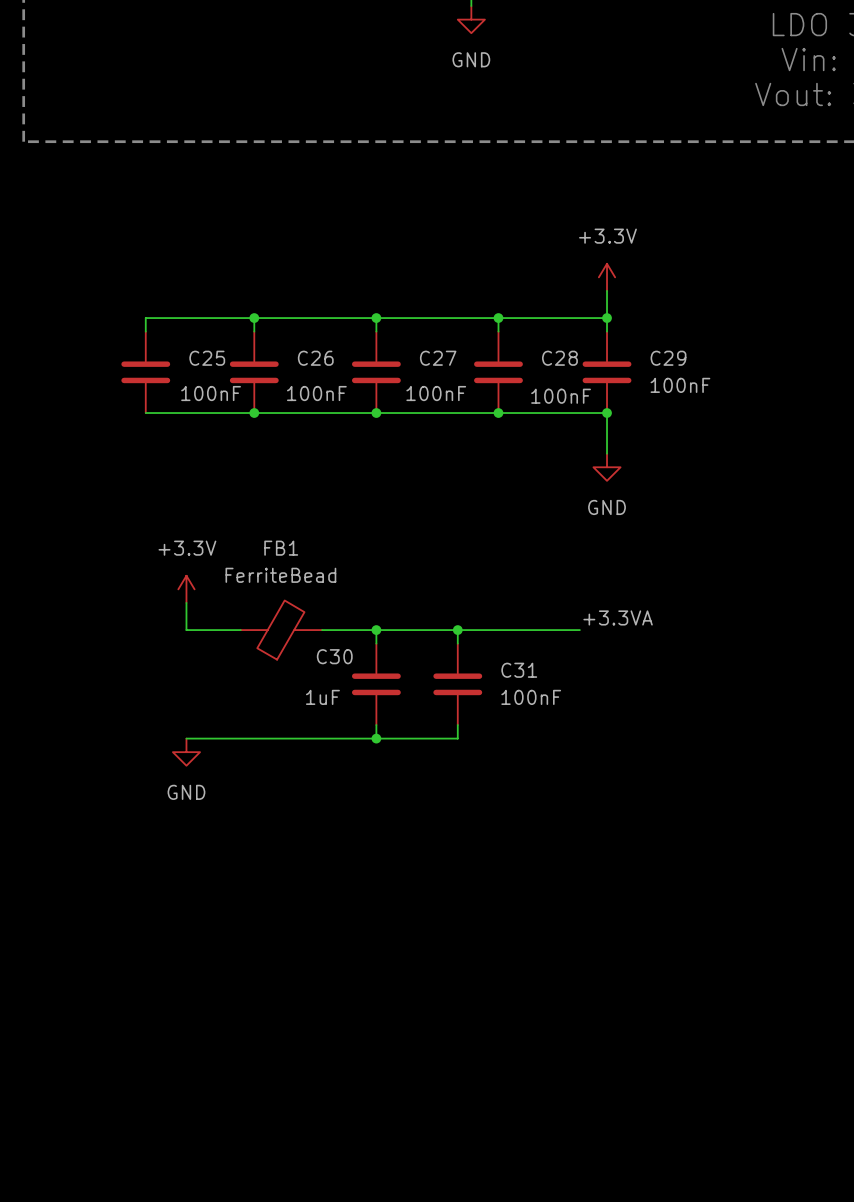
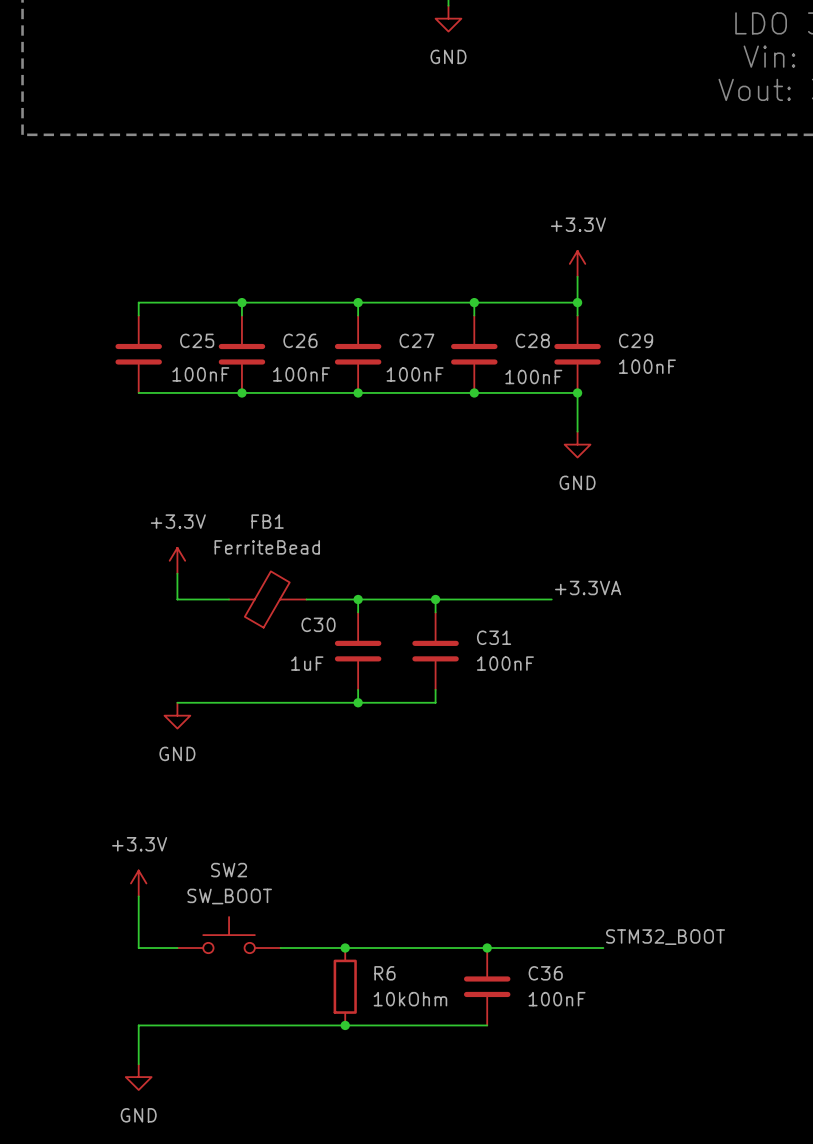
power symbol: none -> +3.3V (138, 883)
wire: none -> (138, 896) (138, 948) (177, 948)
SW2: none -> SW_BOOT (229, 935)
label: none -> STM32_BOOT (665, 937)
wire: none -> (280, 948) (603, 948)
junction: none -> (345, 948)
junction: none -> (487, 948)
R6: none -> 10kOhm (345, 986)
C36: none -> 100nF (487, 986)
junction: none -> (345, 1025)
wire: none -> (487, 1025) (138, 1025) (138, 1064)
power symbol: none -> GND (138, 1077)

